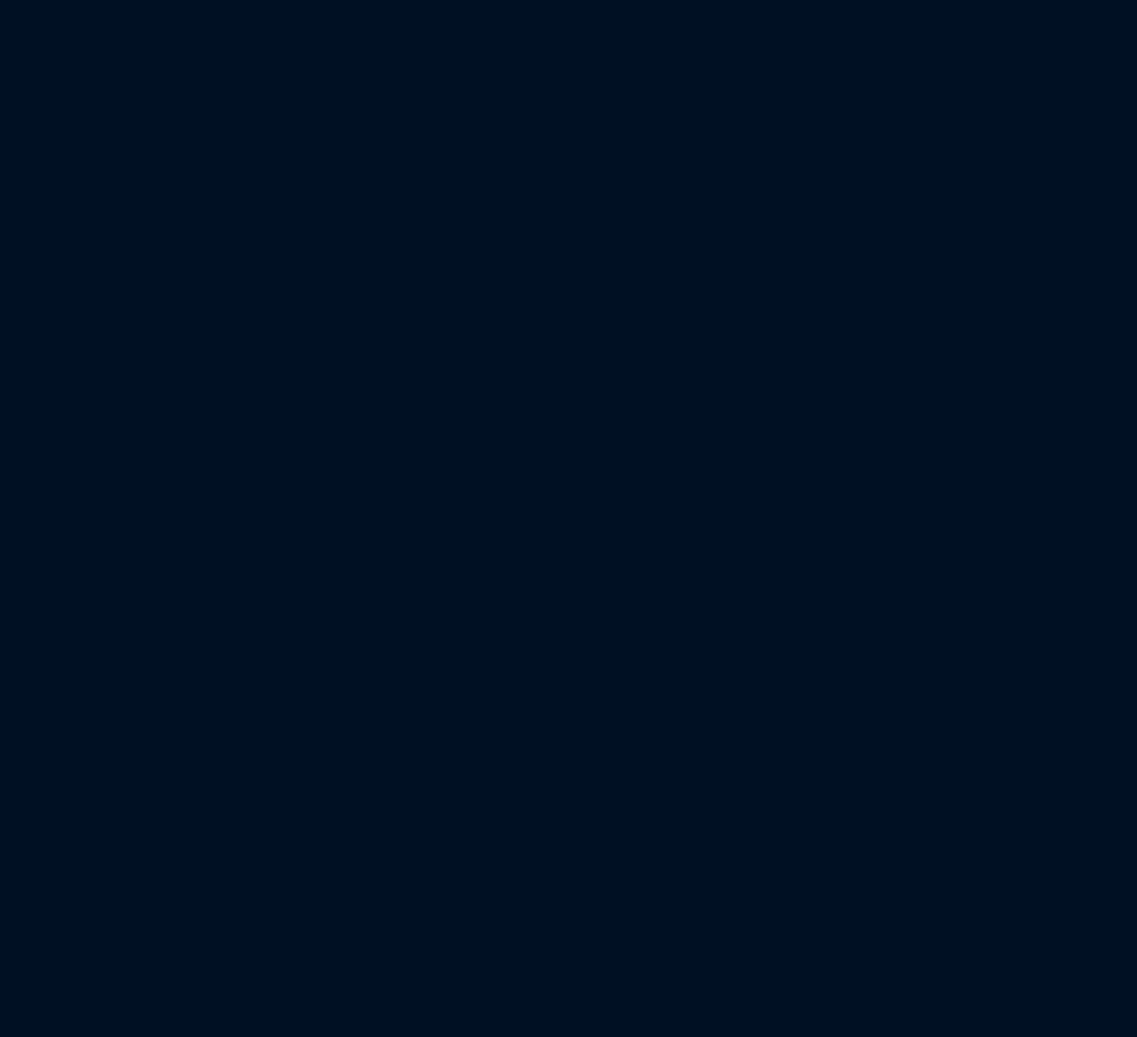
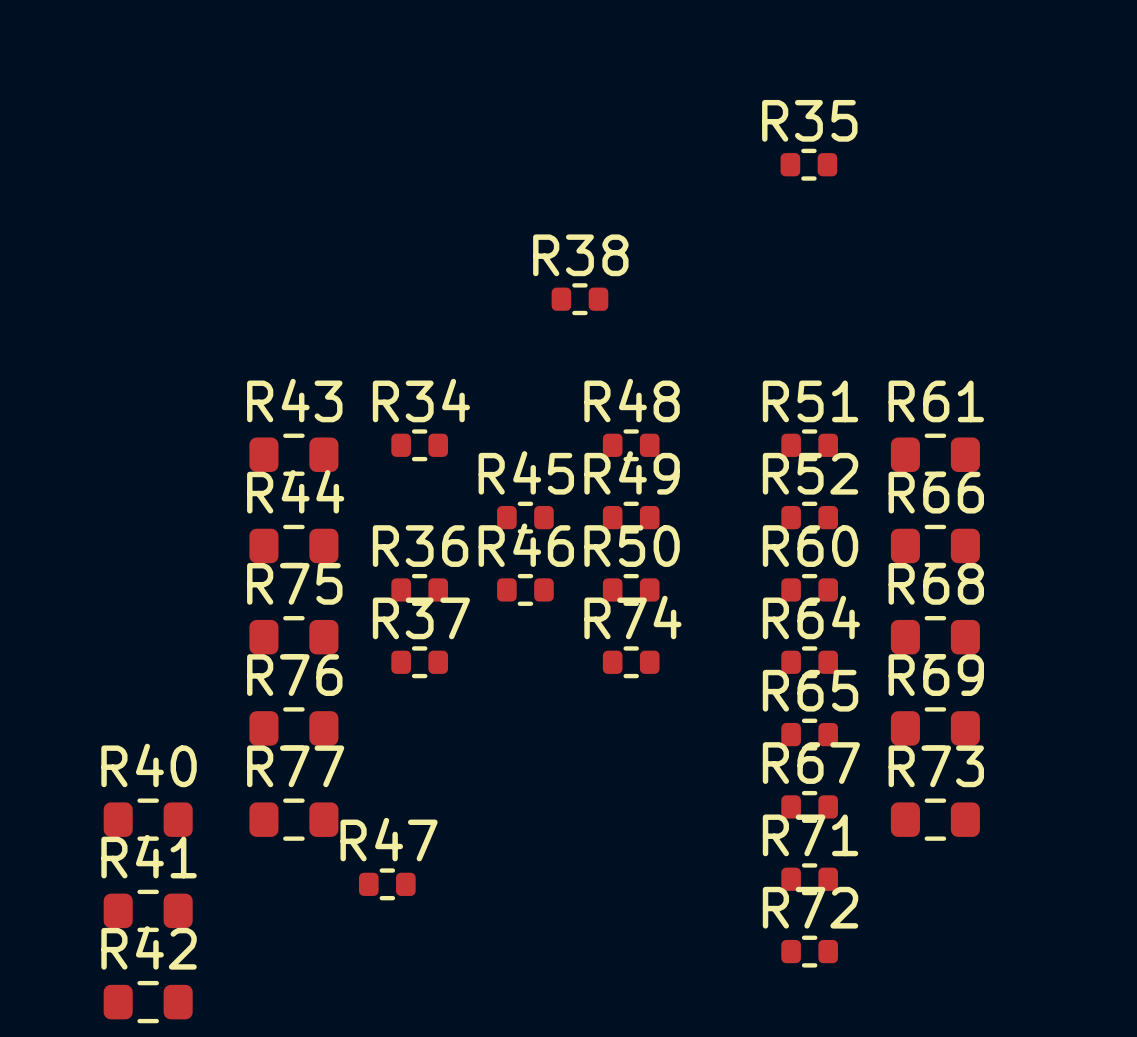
R35: none -> (808, 164)
R38: none -> (579, 299)
R34: none -> (419, 445)
R48: none -> (631, 445)
R51: none -> (809, 445)
R43: none -> (293, 454)
R61: none -> (935, 454)
R45: none -> (525, 517)
R49: none -> (631, 517)
R52: none -> (809, 517)
R44: none -> (293, 545)
R66: none -> (935, 545)
R36: none -> (419, 589)
R46: none -> (525, 589)
R50: none -> (631, 589)
R60: none -> (809, 589)
R75: none -> (293, 637)
R68: none -> (935, 637)
R37: none -> (419, 662)
R74: none -> (631, 662)
R64: none -> (809, 662)
R76: none -> (293, 728)
R69: none -> (935, 728)
R65: none -> (809, 734)
R67: none -> (809, 806)
R40: none -> (148, 819)
R77: none -> (293, 819)
R73: none -> (935, 819)
R71: none -> (809, 879)
R47: none -> (387, 884)
R41: none -> (148, 910)
R72: none -> (809, 951)
R42: none -> (148, 1002)

